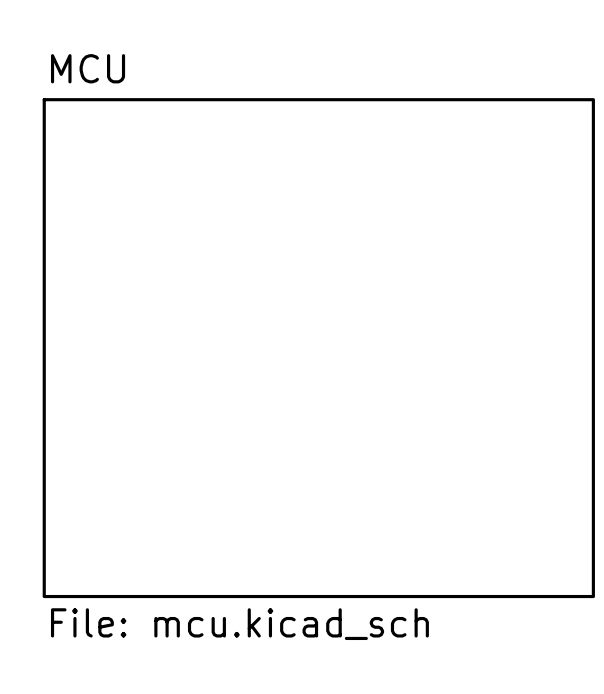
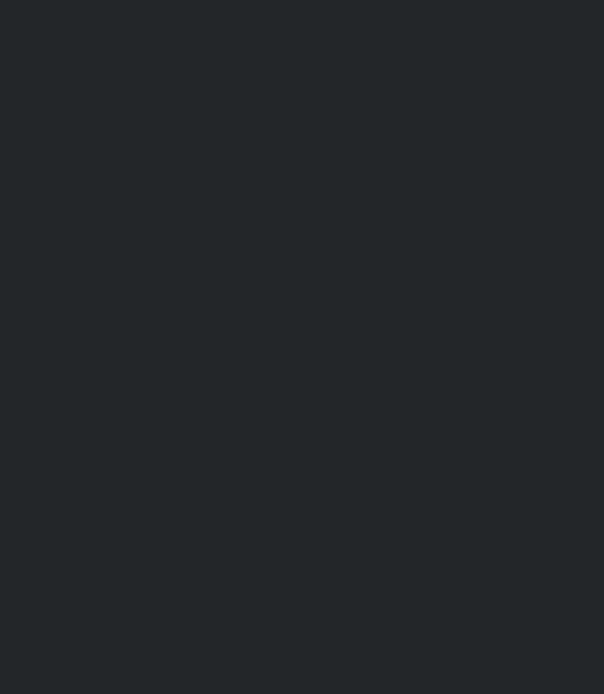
sheet MCU: File: mcu.kicad_sch (318, 348) -> none

